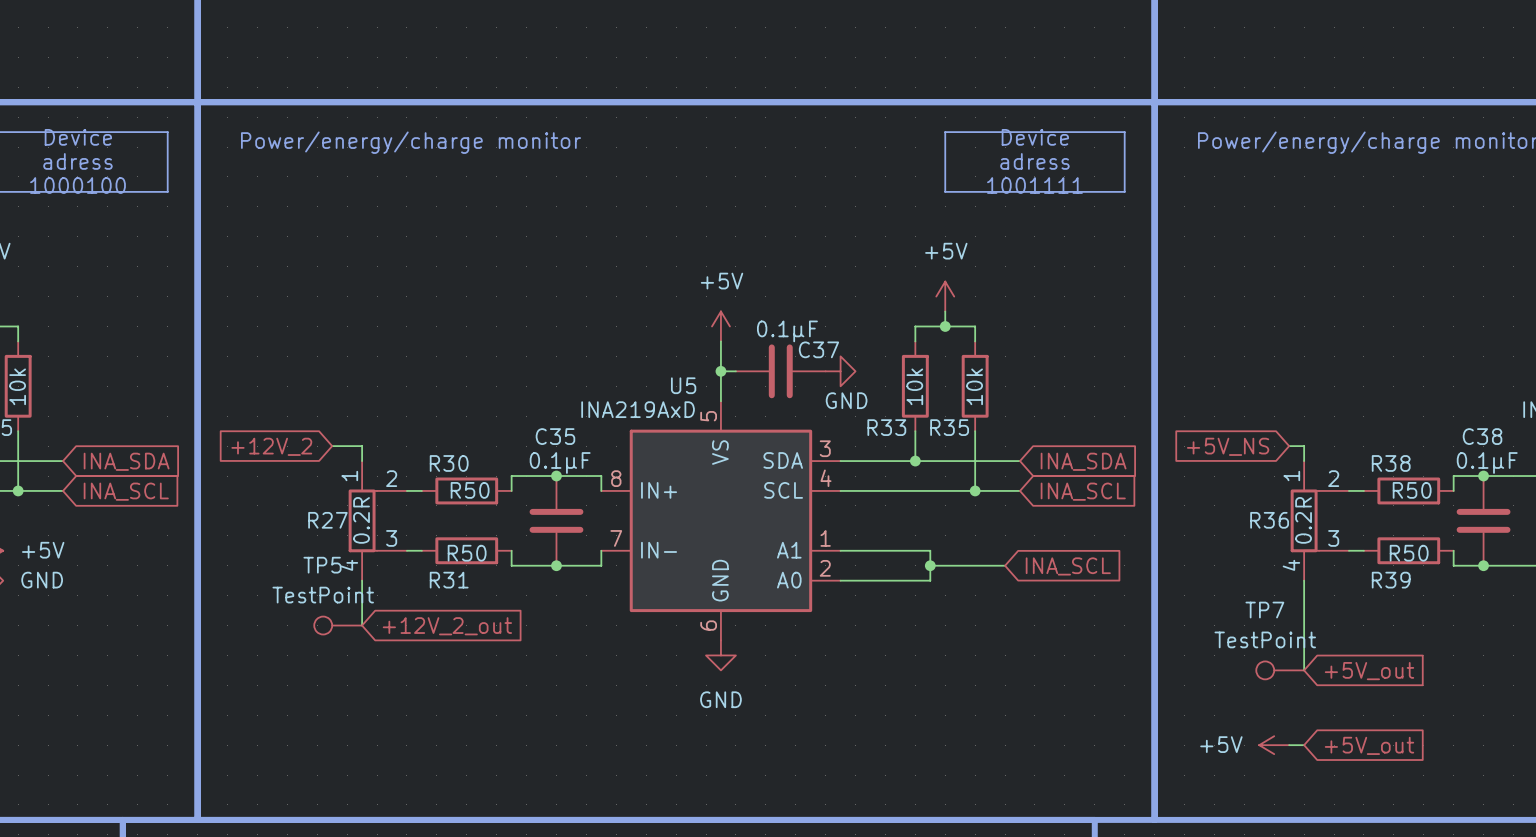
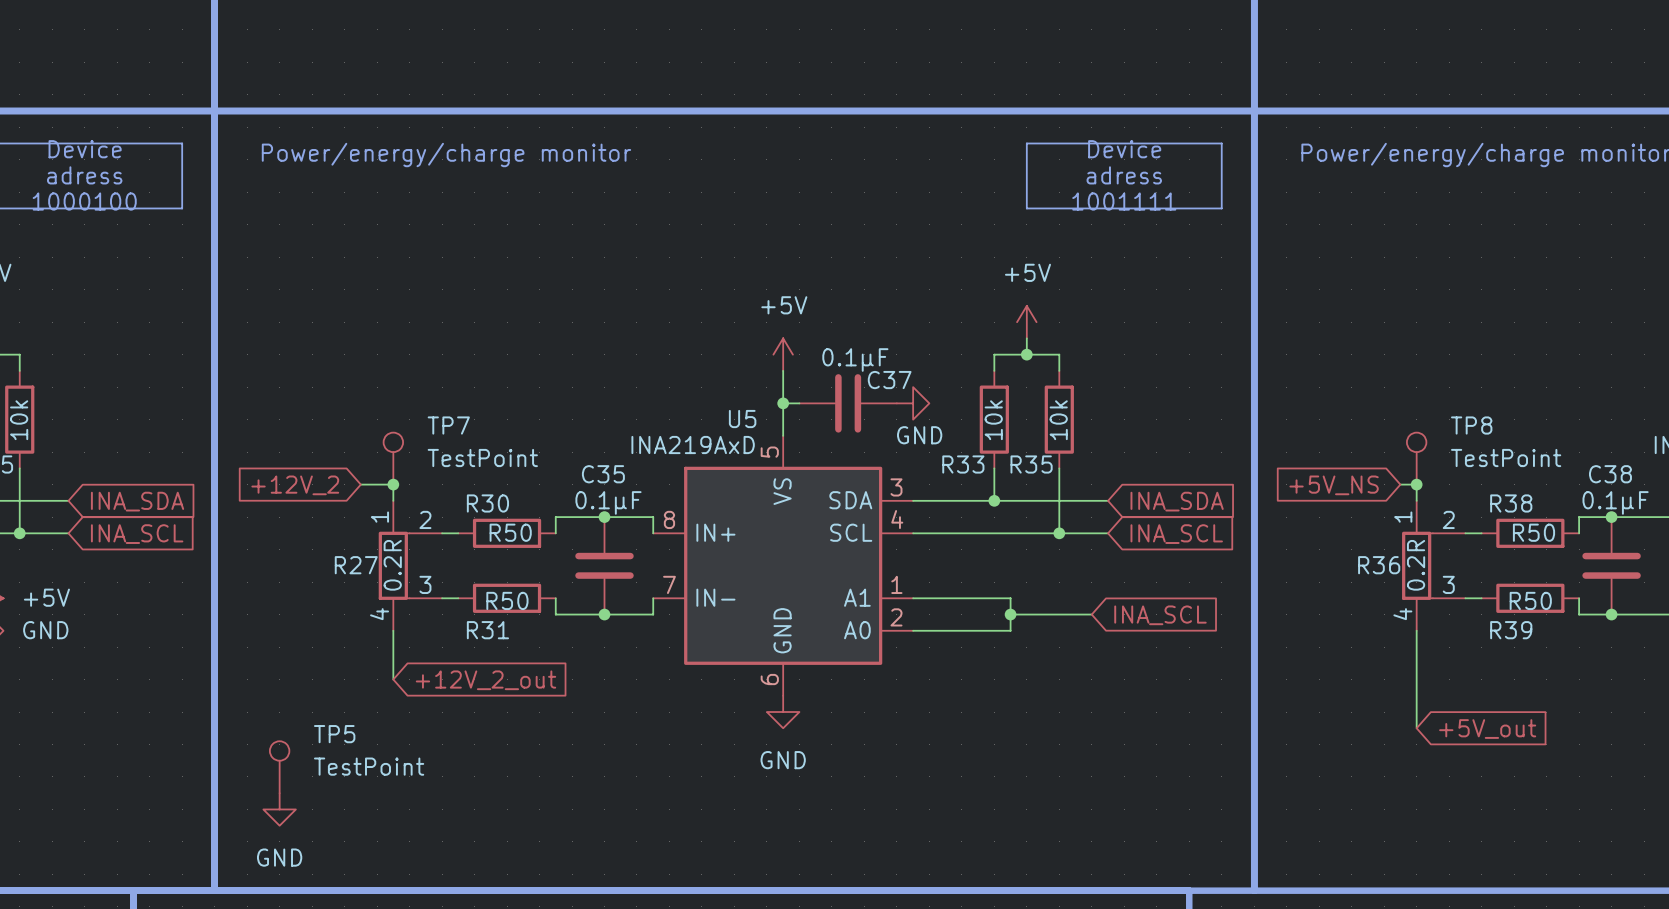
TP8: none -> TestPoint (1416, 458)
junction: none -> (393, 484)
junction: none -> (1416, 484)
TP5 value position: TestPoint (323, 595) -> TestPoint (369, 766)
TP5 rotation: 0° (323, 625) -> 90° clockwise (279, 750)
TP5 position: (338, 625) -> (279, 767)
TP7 value position: TestPoint (1265, 639) -> TestPoint (482, 458)
TP7 rotation: 0° (1265, 670) -> 90° clockwise (393, 442)
TP7 position: (1280, 670) -> (393, 458)
power symbol: none -> GND (279, 809)
power symbol: +5V (1274, 745) -> none
wire: (1289, 745) (1304, 745) -> none
global label: +5V_out (1369, 745) -> none

